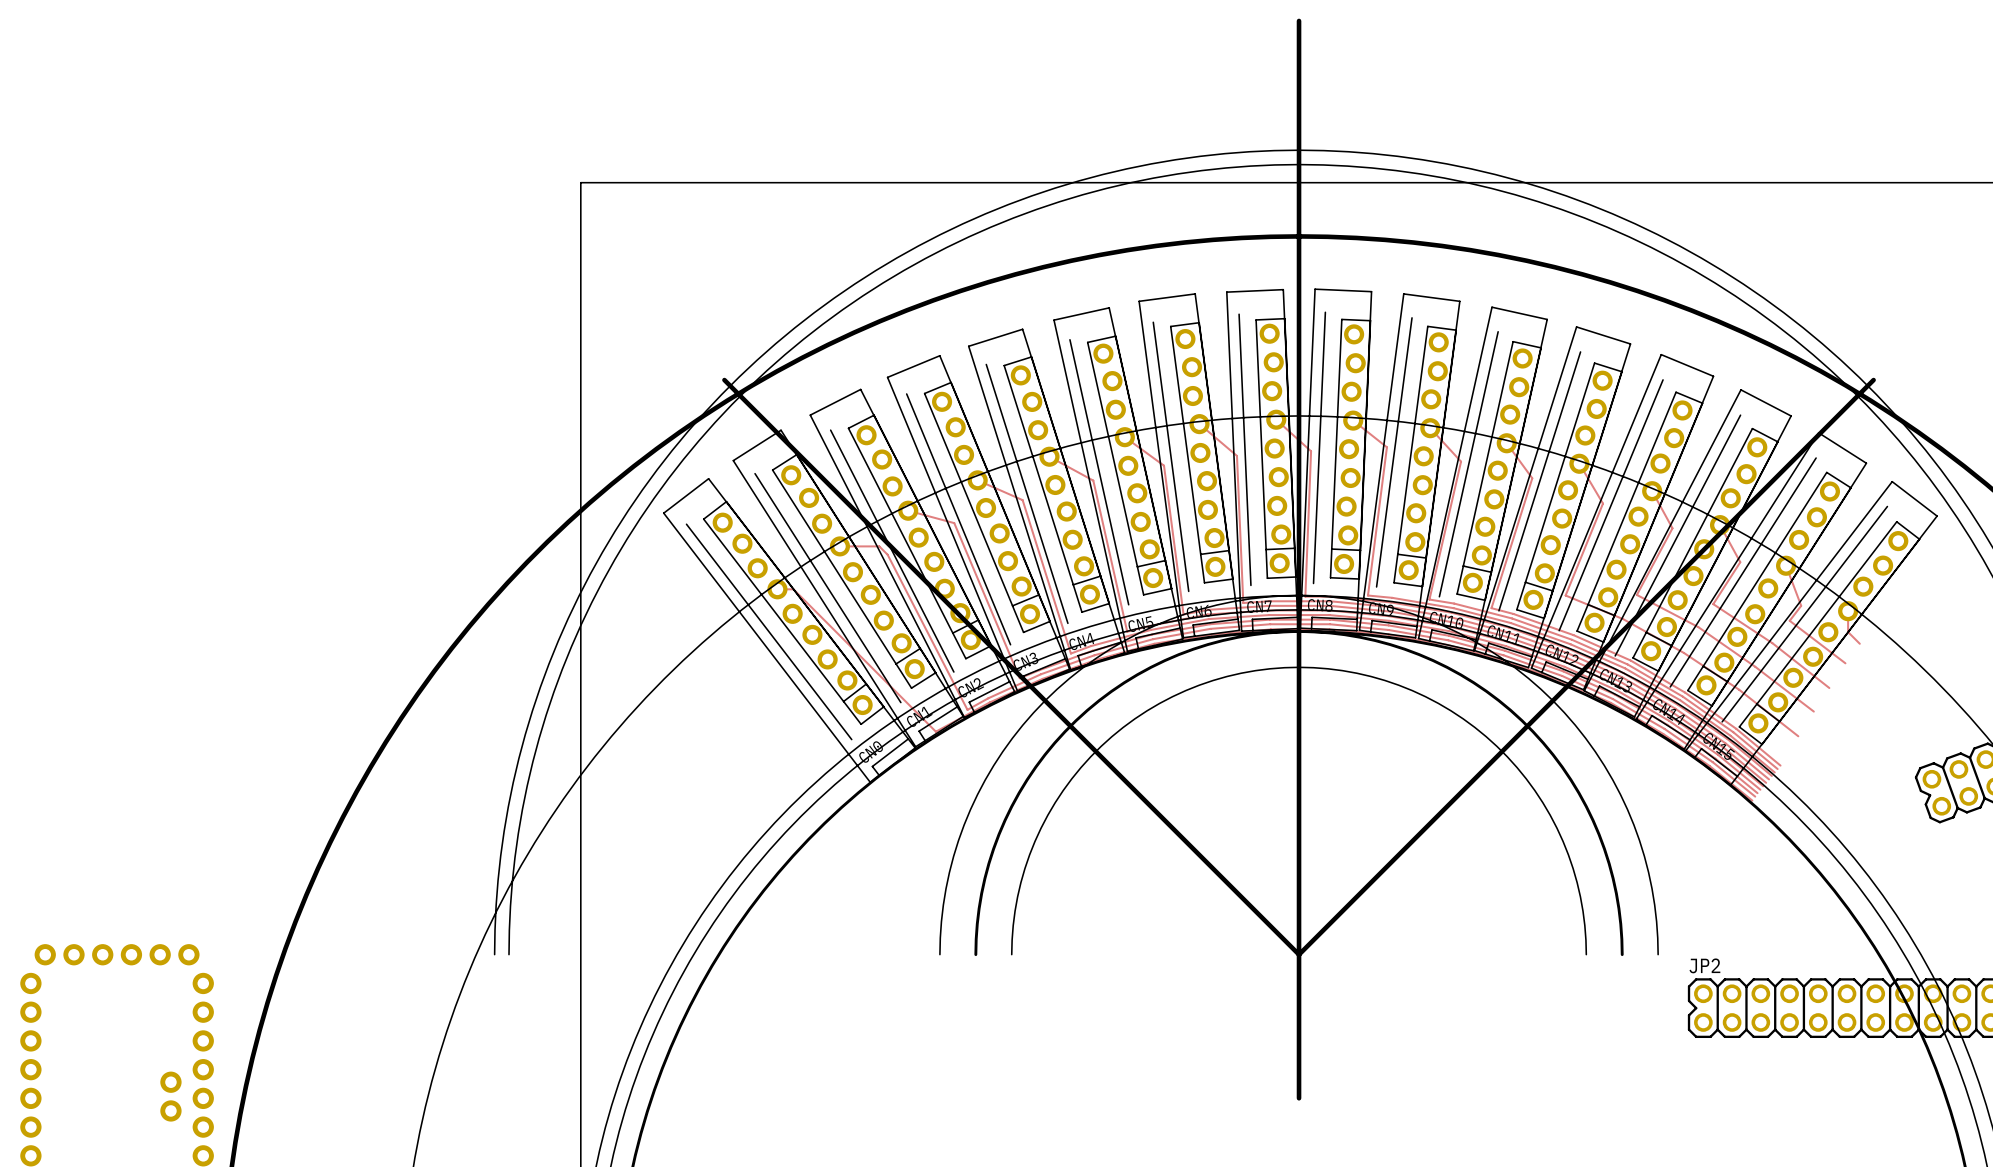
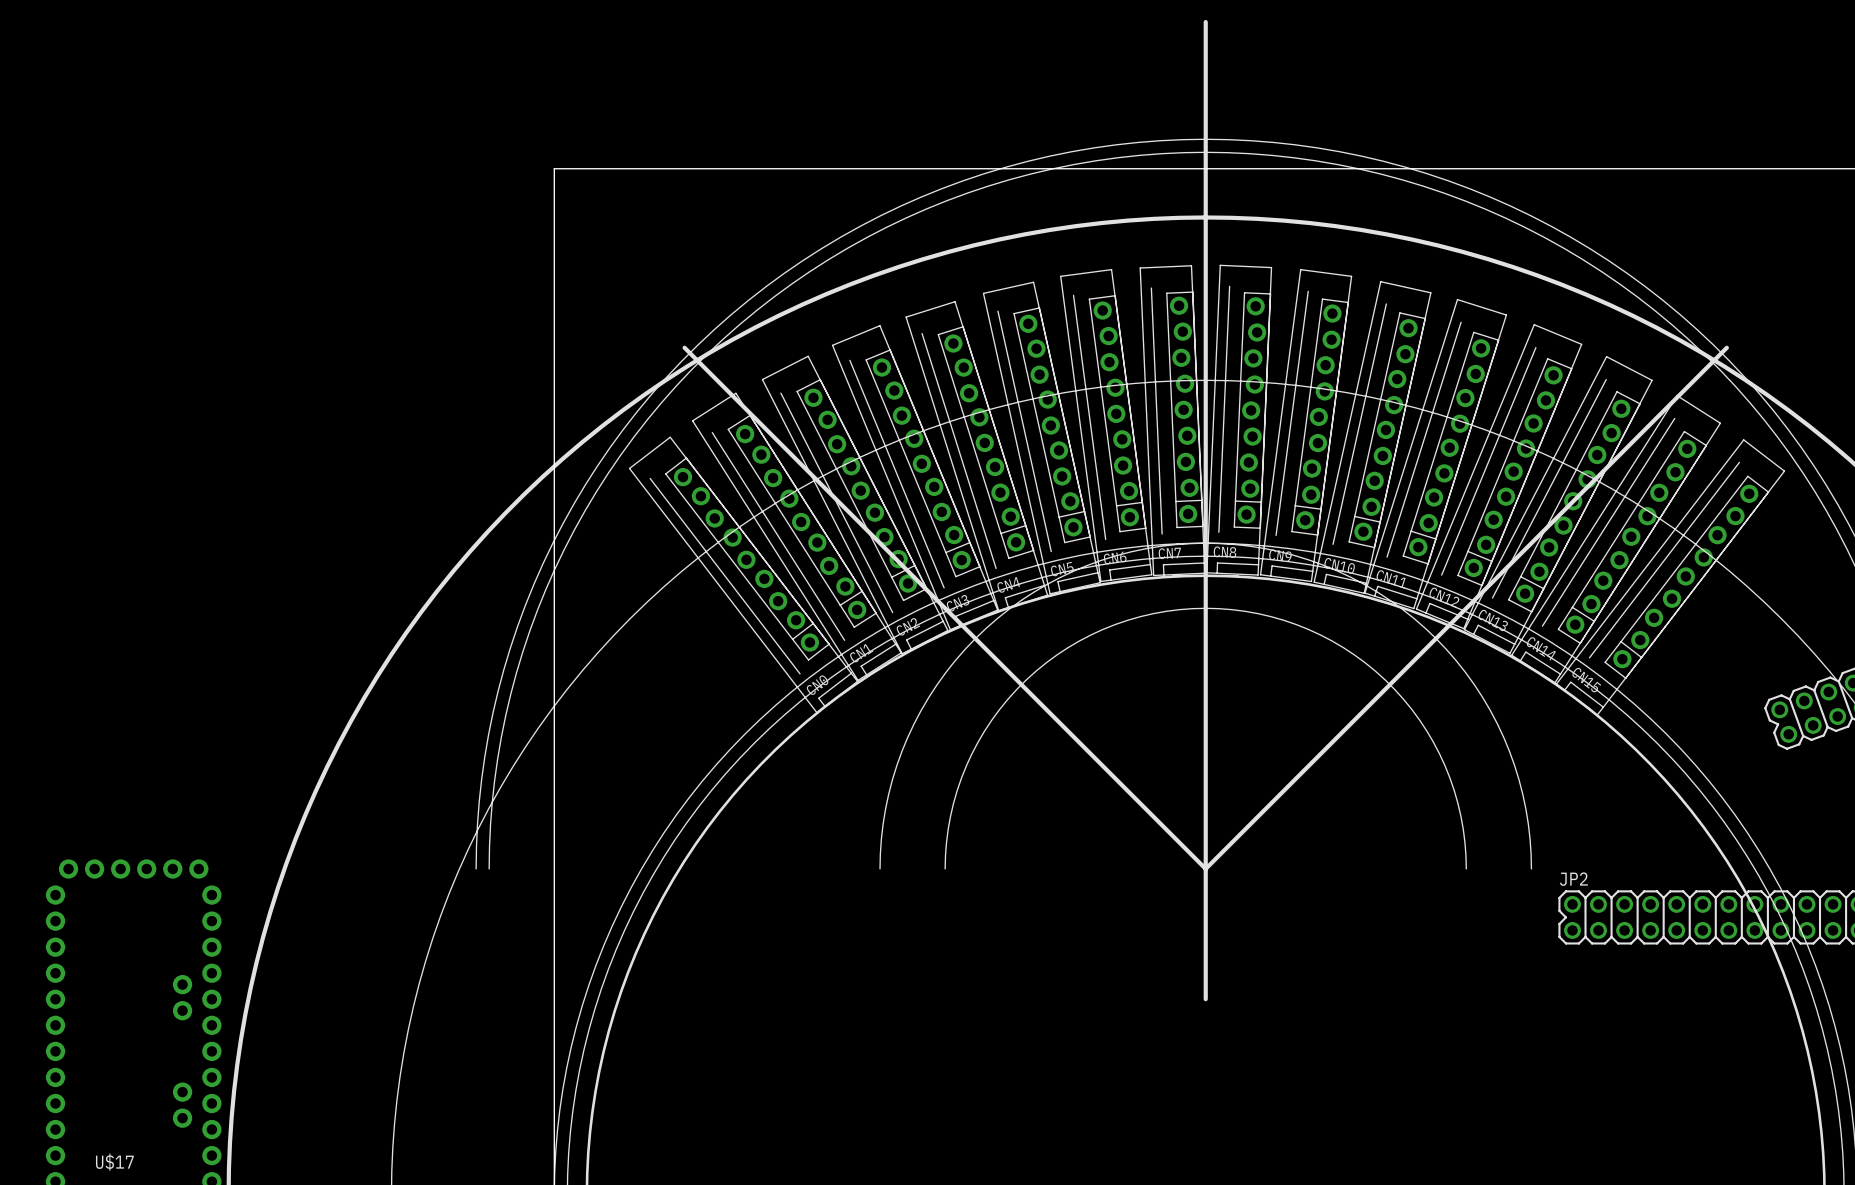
track: (1276, 419) (1311, 451) (1305, 596) (1330, 596) (1390, 602) (1451, 612) (1509, 627) (1569, 648) (1623, 673) (1677, 704) (1727, 739) (1771, 775) -> none
track: (1353, 420) (1386, 447) (1367, 595) (1453, 608) (1511, 623) (1570, 644) (1625, 668) (1679, 700) (1730, 735) (1774, 772) -> none
track: (1199, 424) (1236, 455) (1243, 602) (1330, 601) (1390, 607) (1451, 617) (1507, 632) (1567, 652) (1621, 677) (1675, 708) (1725, 743) (1769, 779) -> none
track: (1430, 428) (1461, 461) (1429, 599) (1454, 603) (1512, 618) (1571, 639) (1627, 664) (1682, 696) (1733, 732) (1777, 769) -> none
track: (1124, 437) (1164, 465) (1183, 614) (1207, 609) (1269, 605) (1330, 605) (1390, 611) (1450, 621) (1507, 636) (1566, 657) (1620, 681) (1673, 712) (1723, 747) (1766, 782) -> none
track: (1506, 443) (1532, 478) (1491, 608) (1573, 635) (1630, 660) (1685, 692) (1736, 728) (1780, 765) -> none
track: (1049, 456) (1093, 480) (1127, 631) (1207, 614) (1269, 610) (1330, 610) (1389, 616) (1449, 626) (1506, 641) (1566, 662) (1618, 685) (1670, 716) (1720, 751) (1763, 786) -> none
track: (1579, 463) (1602, 503) (1565, 595) (1623, 619) (1683, 652) (1739, 689) (1798, 736) -> none
track: (977, 480) (1022, 500) (1070, 653) (1150, 630) (1208, 619) (1269, 615) (1329, 615) (1389, 620) (1448, 631) (1505, 646) (1564, 666) (1616, 690) (1669, 720) (1717, 754) (1760, 789) -> none
track: (1652, 491) (1672, 528) (1636, 594) (1698, 627) (1755, 666) (1813, 711) -> none
track: (908, 510) (954, 523) (1019, 678) (1092, 650) (1151, 634) (1209, 624) (1269, 619) (1330, 619) (1388, 625) (1448, 635) (1504, 650) (1563, 671) (1614, 694) (1667, 724) (1715, 758) (1757, 793) -> none
track: (1720, 525) (1740, 562) (1713, 604) (1772, 643) (1829, 688) -> none
track: (839, 546) (879, 546) (887, 554) (967, 709) (1041, 674) (1094, 655) (1153, 639) (1210, 628) (1270, 624) (1330, 624) (1388, 630) (1448, 640) (1503, 655) (1562, 675) (1612, 698) (1664, 728) (1712, 762) (1755, 796) -> none
track: (1786, 565) (1801, 605) (1789, 620) (1845, 663) -> none
track: (777, 589) (793, 589) (935, 731) (989, 702) (1042, 678) (1096, 659) (1154, 643) (1211, 634) (1270, 629) (1329, 629) (1388, 634) (1447, 644) (1502, 659) (1559, 680) (1611, 702) (1663, 733) (1709, 766) (1752, 800) -> none
track: (1848, 611) (1848, 632) (1859, 643) -> none
line: (975, 954) (981, 893) (998, 834) (1027, 779) (1065, 731) (1111, 691) (1137, 674) (1178, 654) (1237, 637) (1299, 631) (1360, 637) (1419, 654) (1460, 674) (1486, 691) (1532, 731) (1570, 779) (1599, 834) (1616, 893) (1622, 954) -> none

